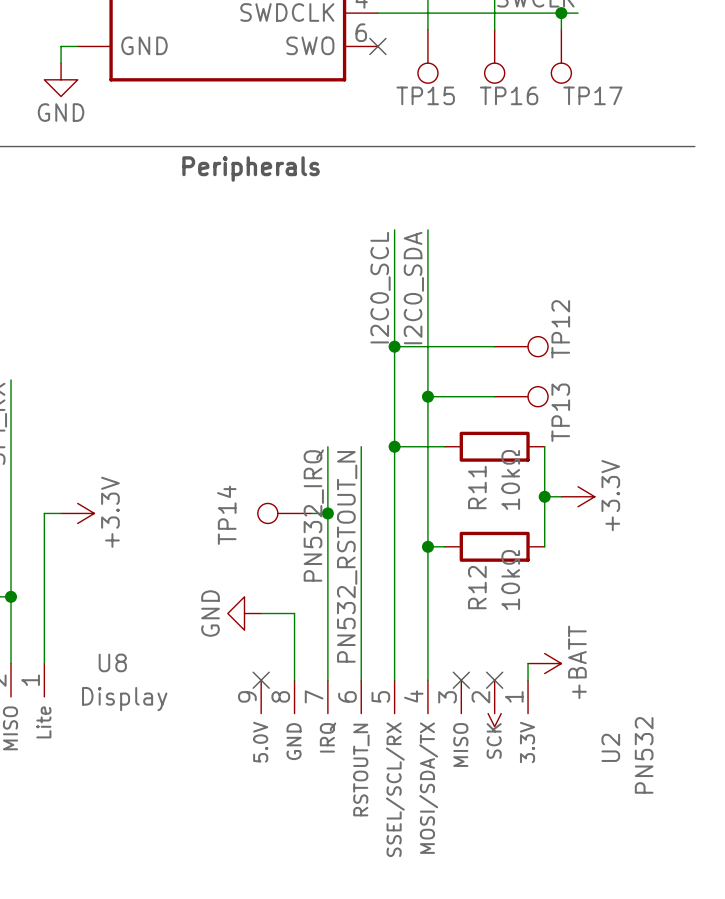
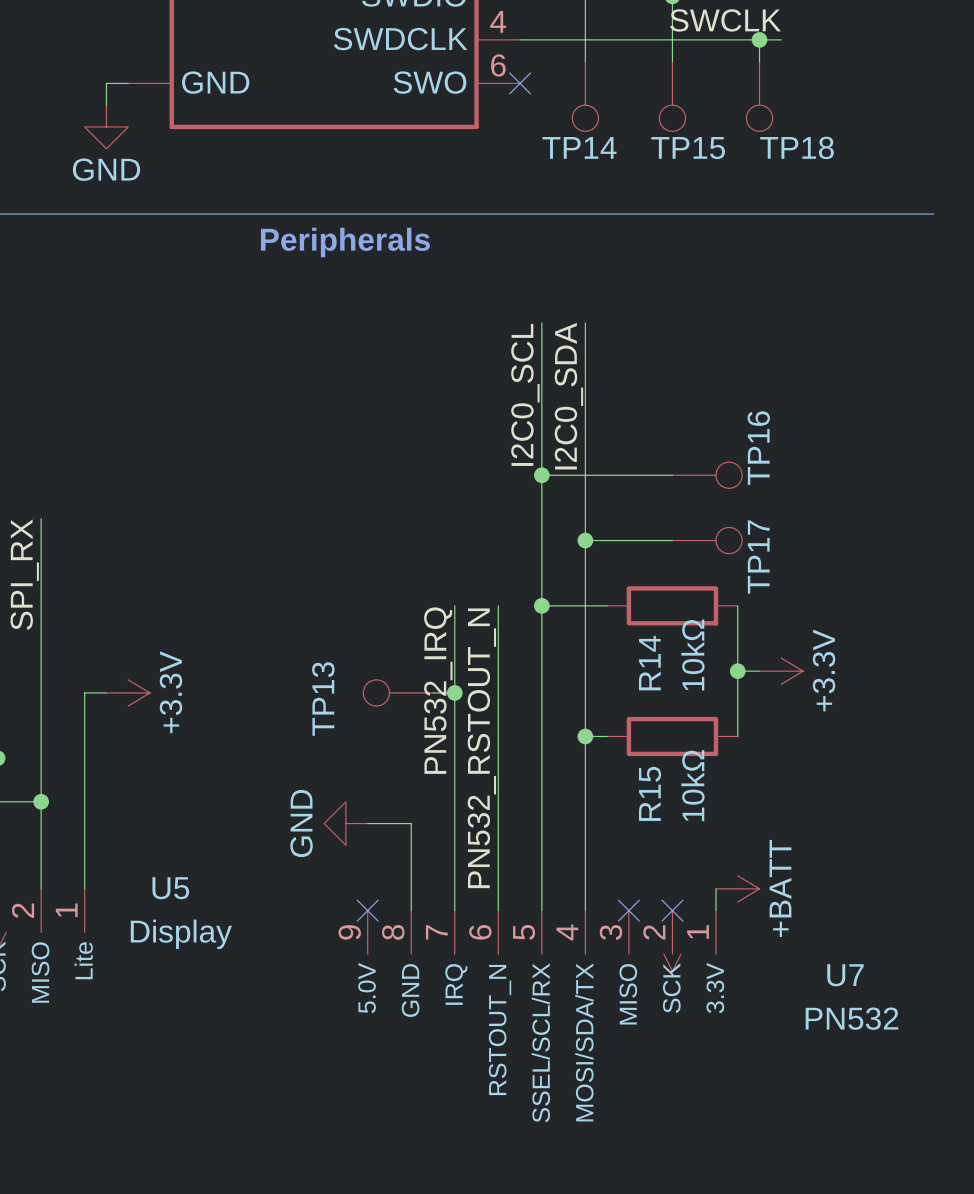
TP15 name: TP15 (425, 95) -> TP14 (579, 147)
TP16 name: TP16 (509, 95) -> TP15 (688, 148)
TP17 name: TP17 (592, 95) -> TP18 (797, 147)
TP12 name: TP12 (560, 329) -> TP16 (758, 448)
TP13 name: TP13 (560, 412) -> TP17 (758, 557)
R11 name: R11 (477, 487) -> R14 (649, 663)
TP14 name: TP14 (226, 515) -> TP13 (323, 699)
R12 name: R12 (477, 587) -> R15 (650, 793)
U8 name: U8 (112, 662) -> U5 (170, 888)
U2 name: U2 (610, 747) -> U7 (845, 975)
U2 value rotation: 0° (644, 755) -> 90° clockwise (851, 1018)

